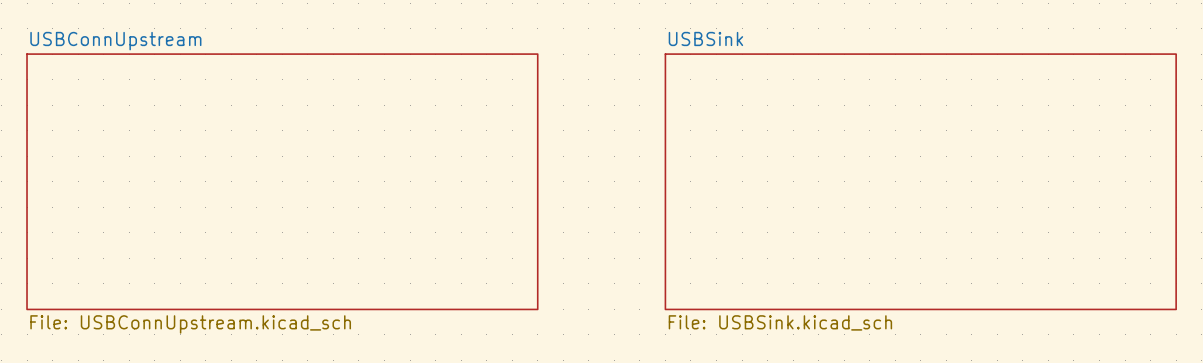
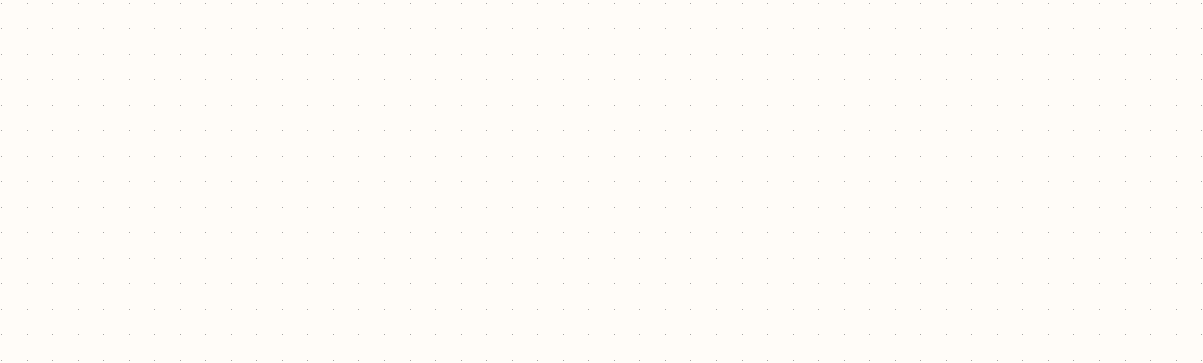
sheet USBConnUpstream: File: USBConnUpstream.kicad_sch (282, 181) -> none
sheet USBSink: File: USBSink.kicad_sch (920, 181) -> none

